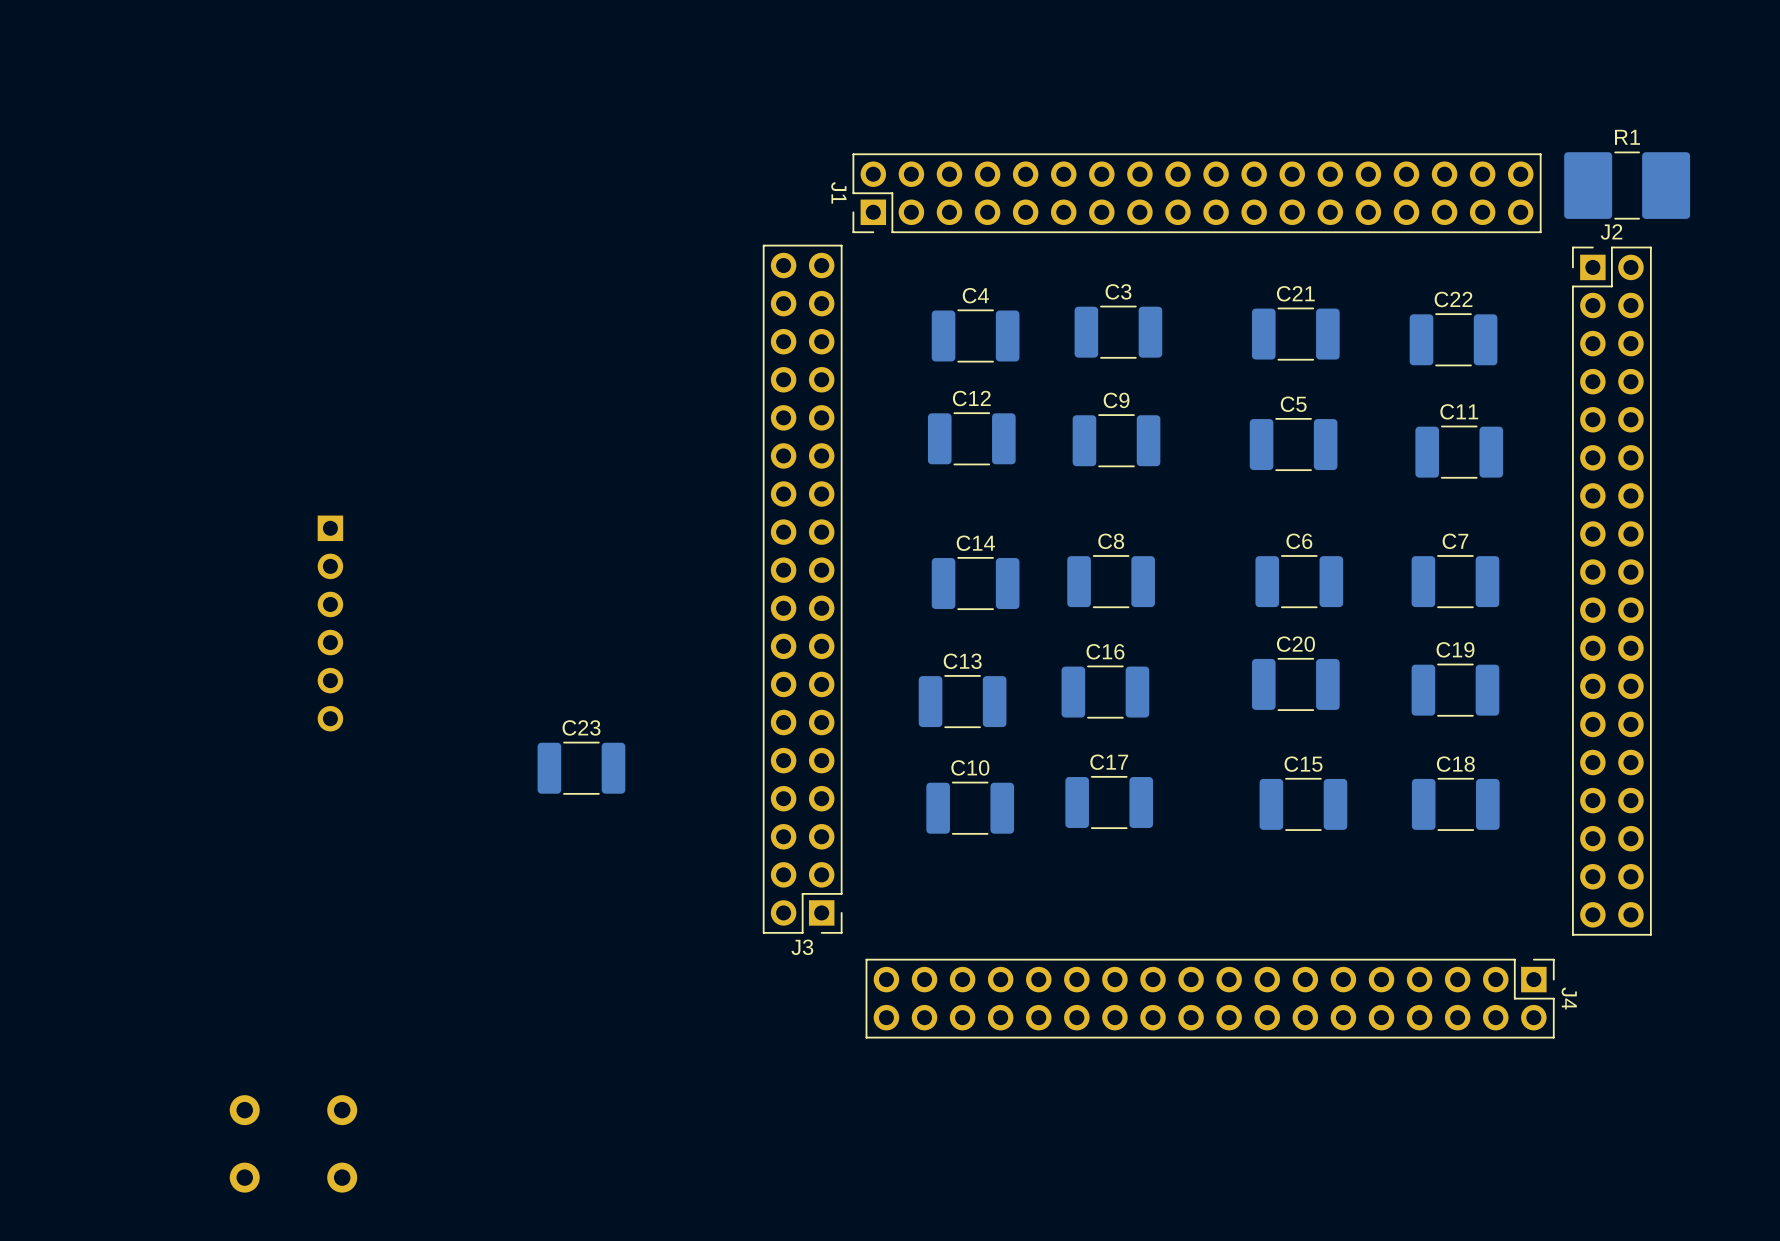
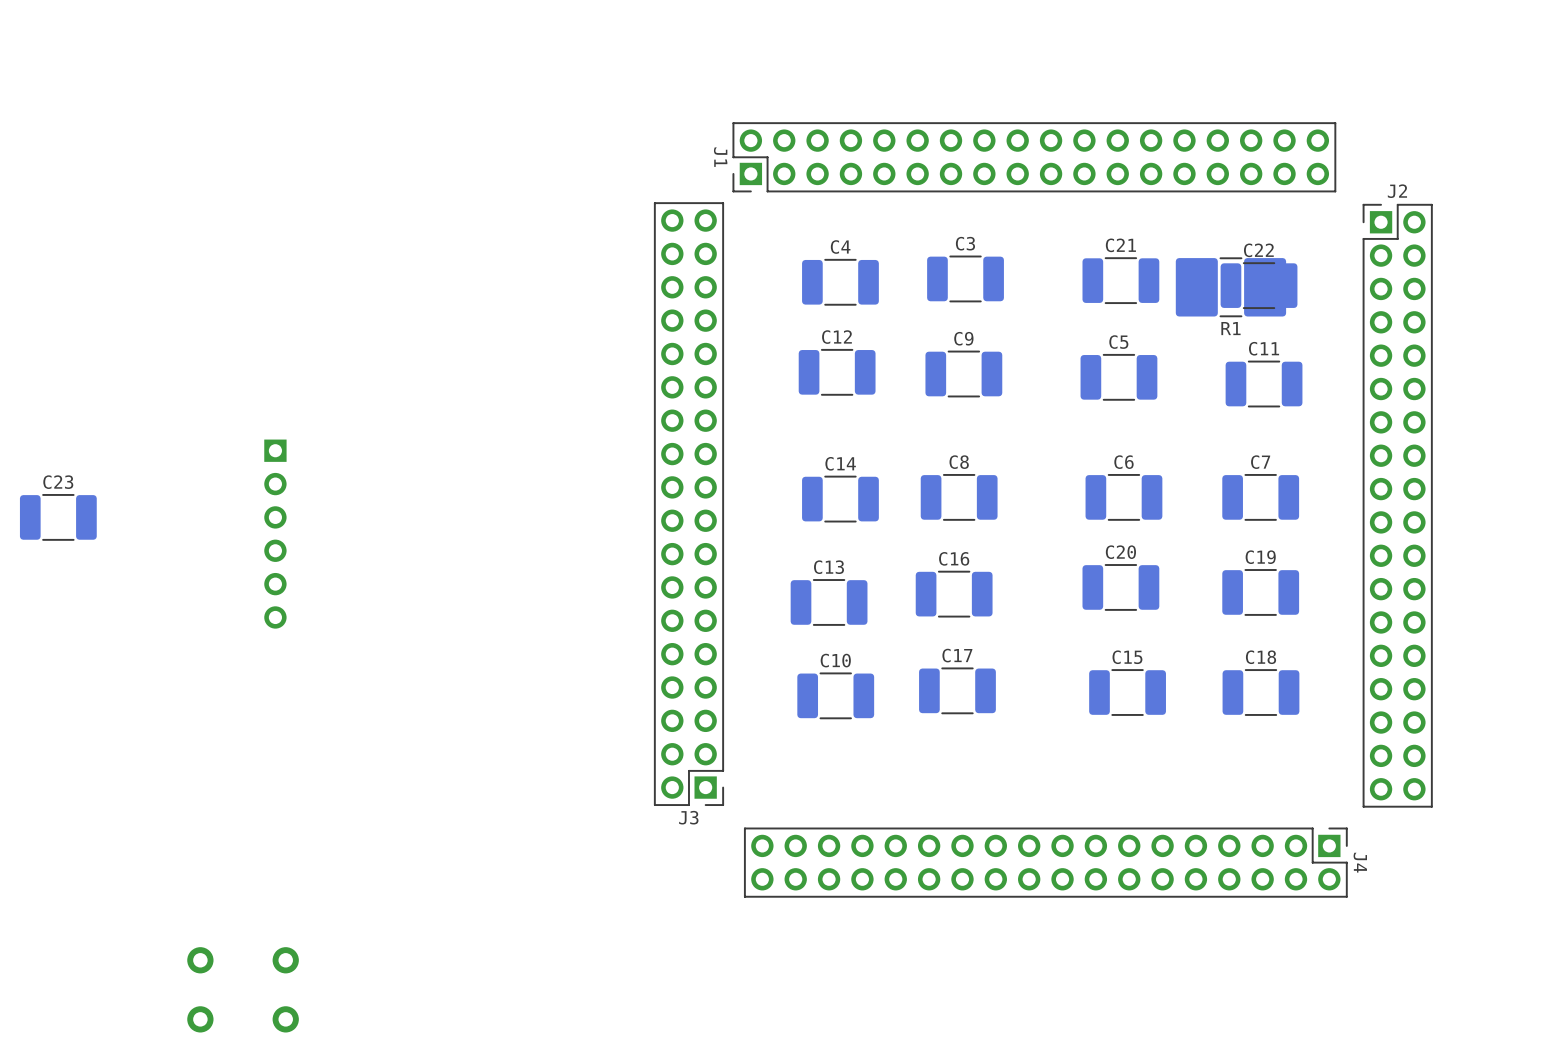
R1 name position: R1 (1627, 137) -> R1 (1230, 328)
R1 position: (1627, 185) -> (1230, 287)
C23 position: (581, 768) -> (58, 517)

